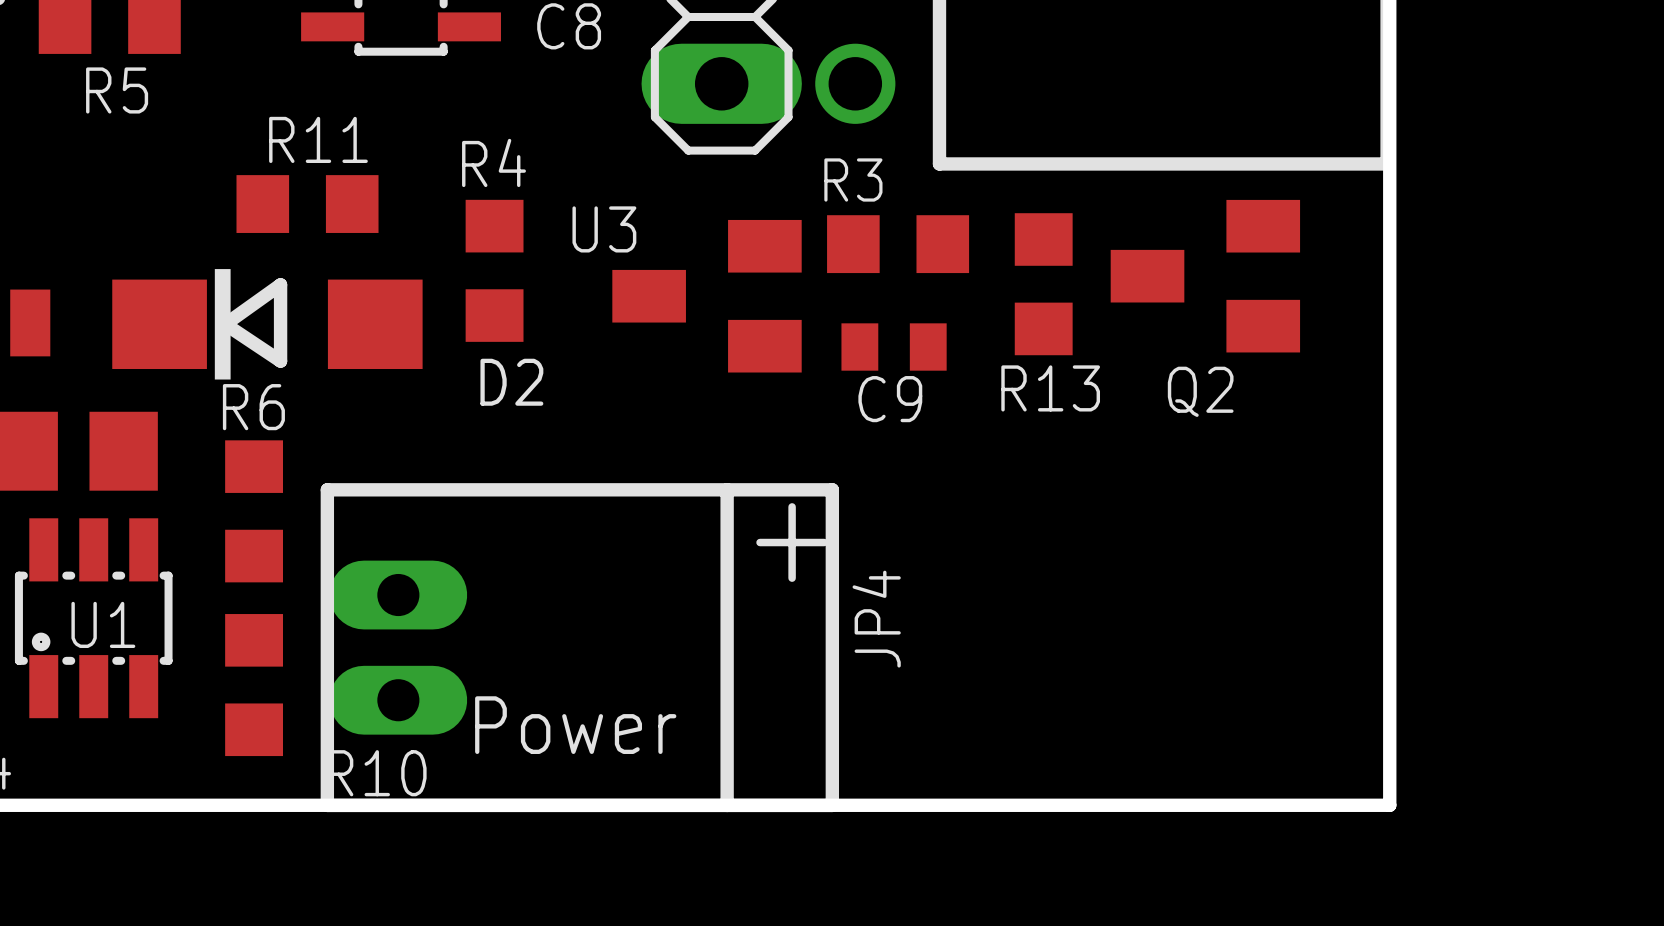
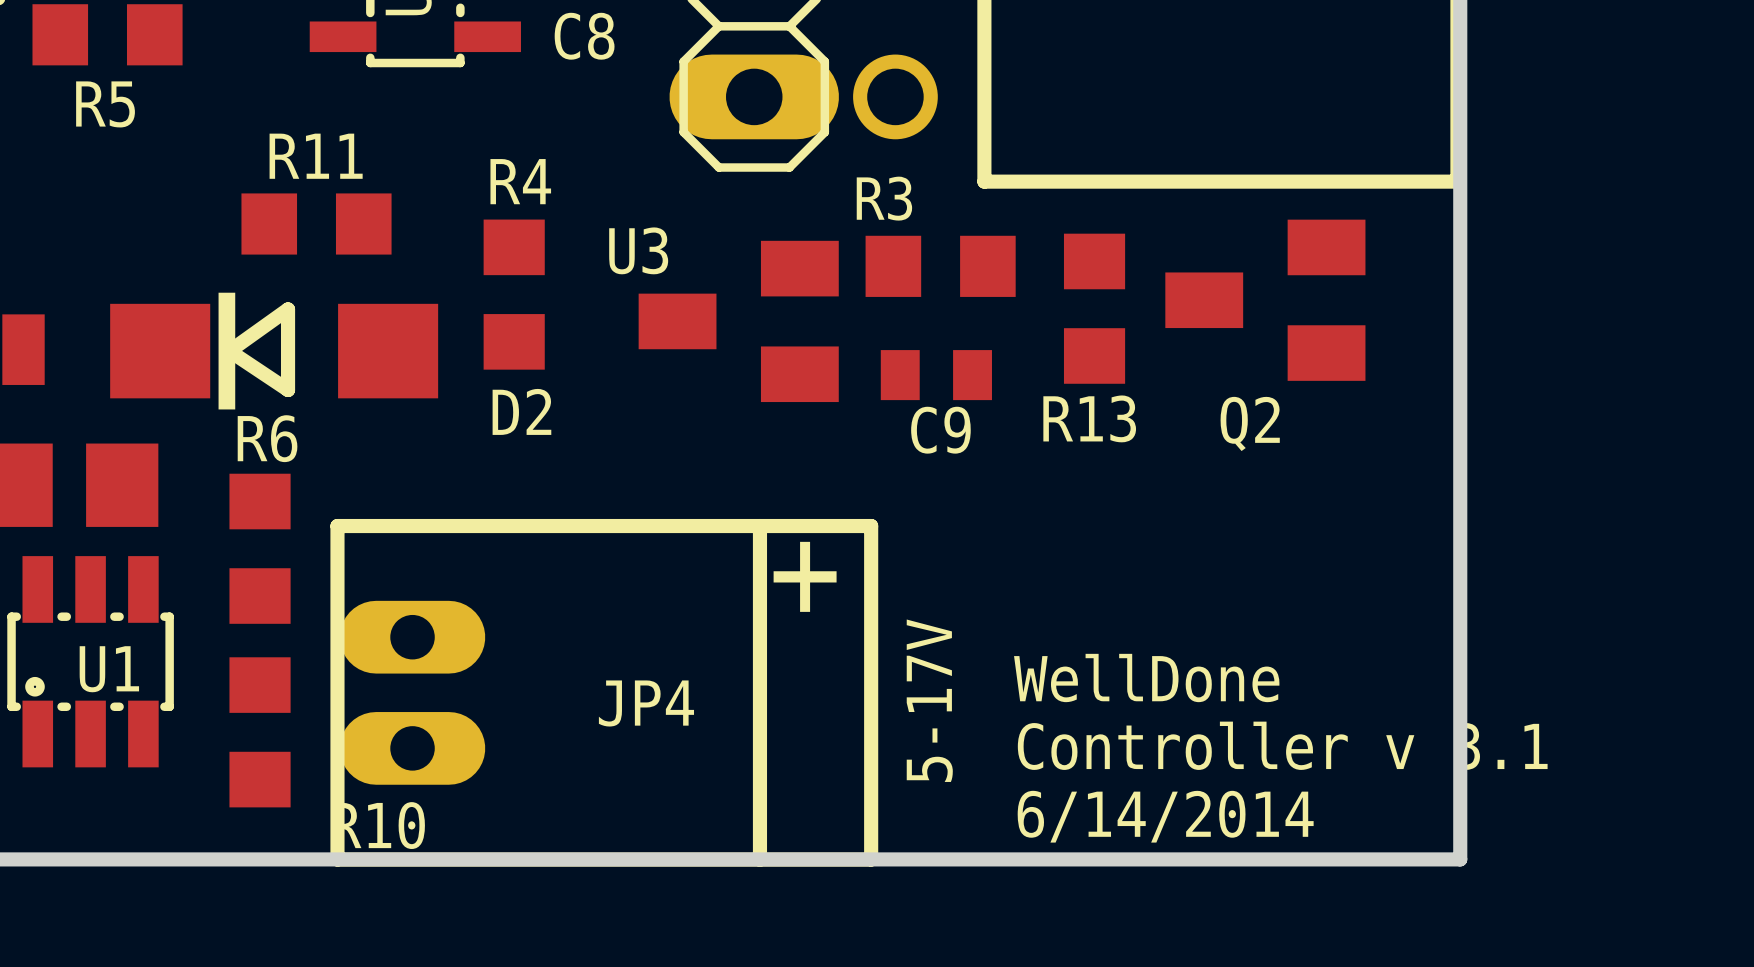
JP4 name rotation: 0° (876, 619) -> 90° clockwise (646, 703)
JP4 name position: JP4 (876, 619) -> JP4 (646, 703)
text: none -> WellDone (1146, 678)
text: none -> 5-17V (929, 700)
text: none -> Controller v 3.1 (1282, 745)
text: Power (575, 725) -> none
text: none -> 6/14/2014 (1165, 816)

